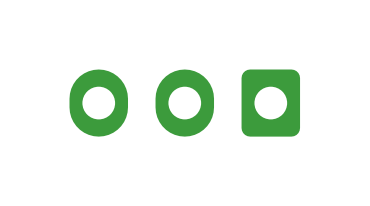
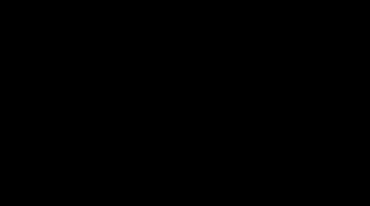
part: (184, 103) -> none

